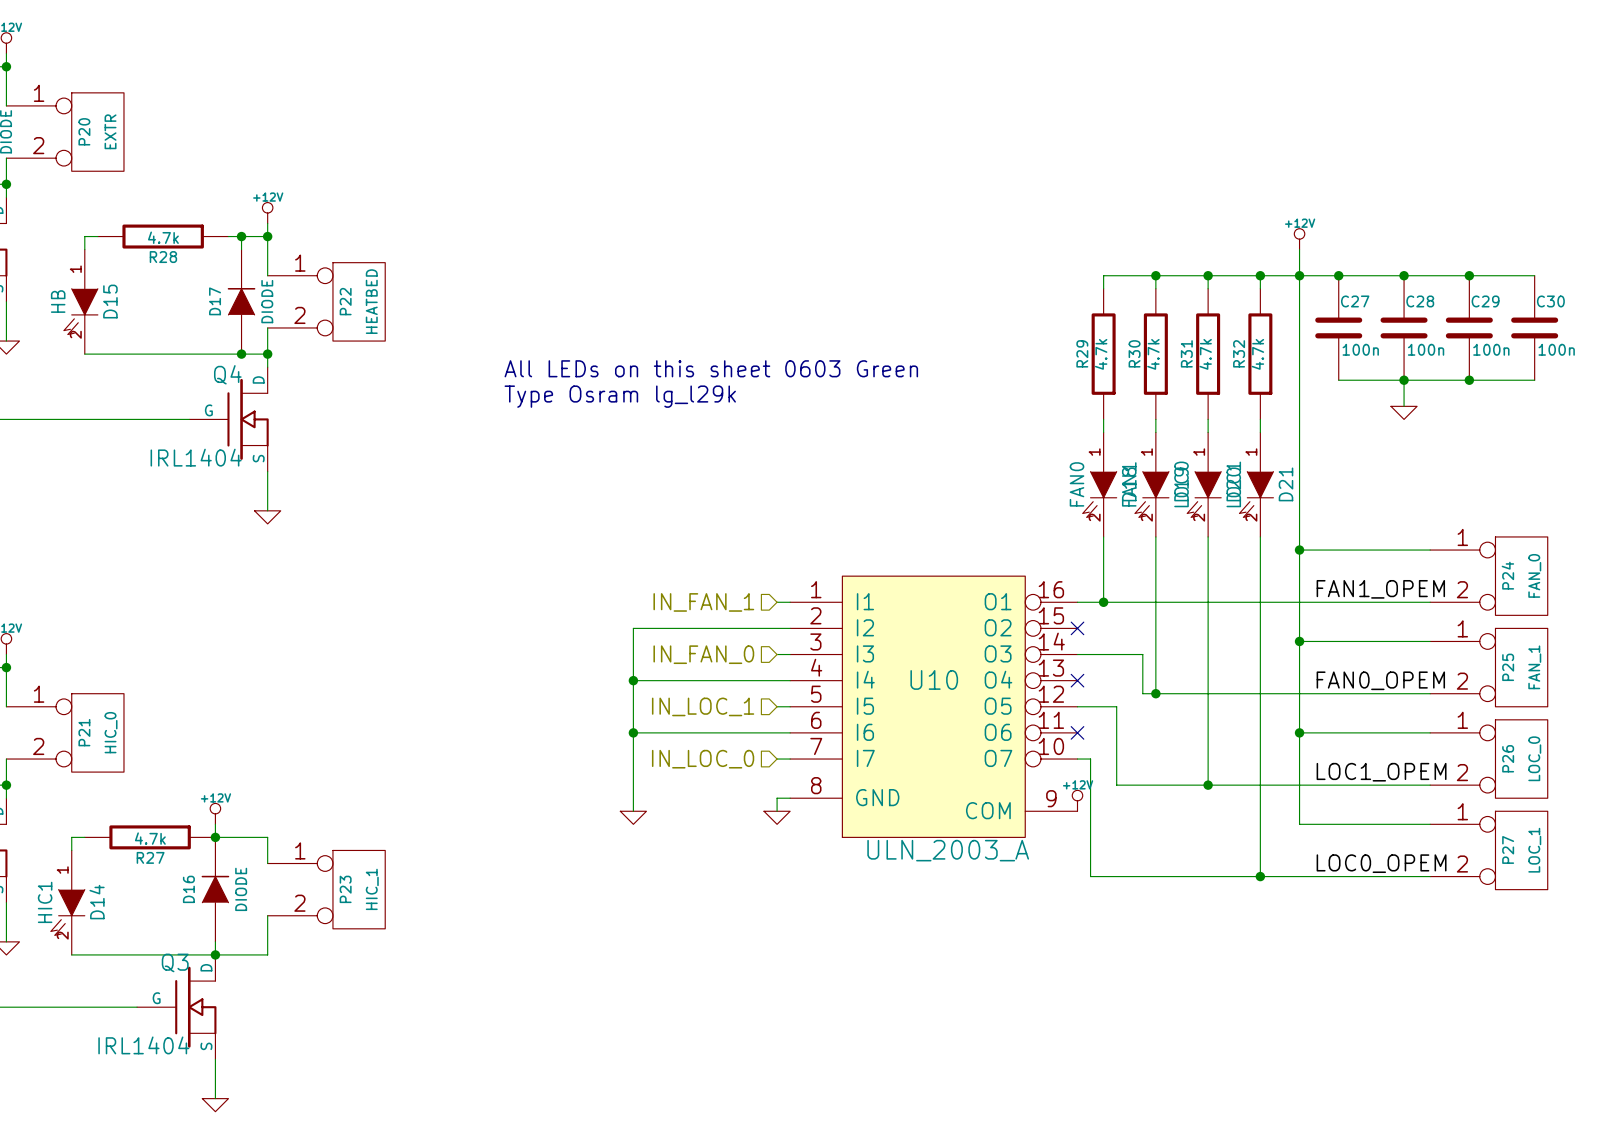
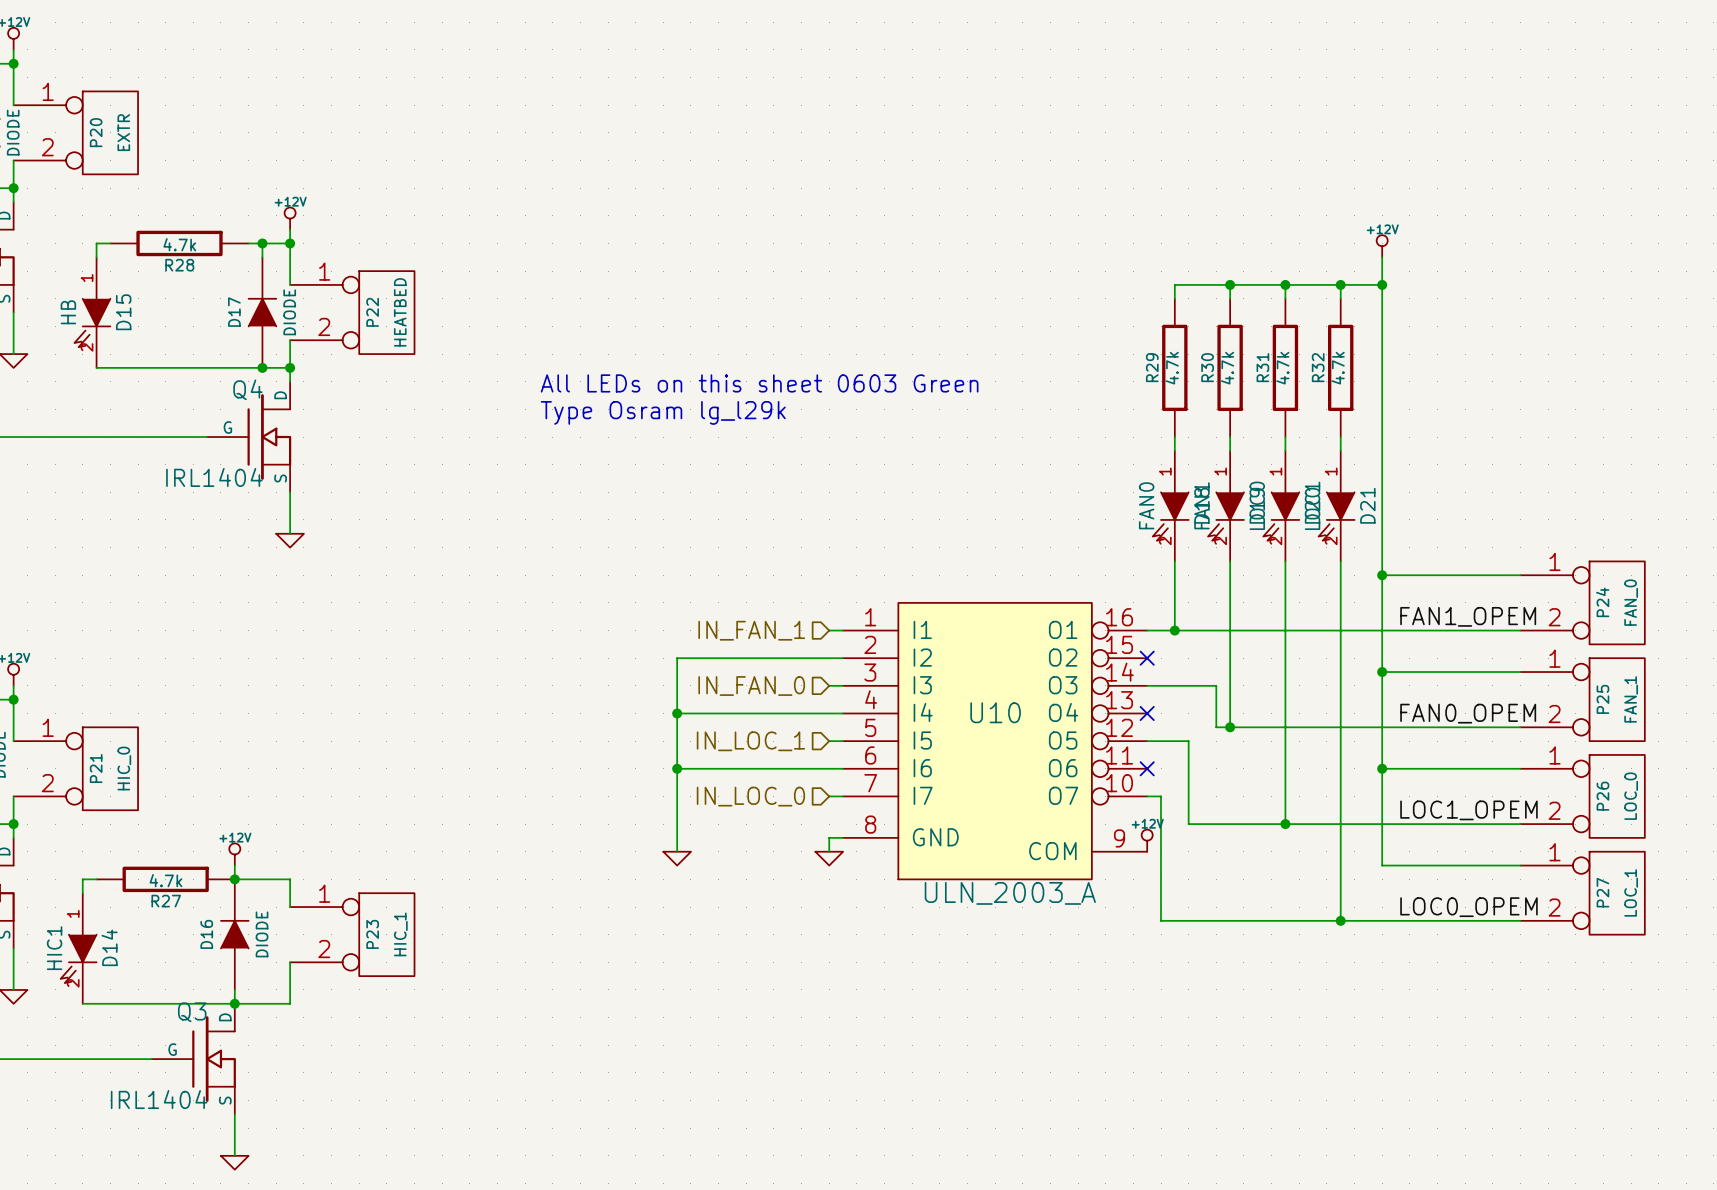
wire: (1299, 275) (1534, 275) -> none
junction: (1338, 275) -> none
junction: (1404, 275) -> none
junction: (1469, 275) -> none
C27: 100n (1338, 327) -> none
C28: 100n (1404, 327) -> none
C29: 100n (1469, 327) -> none
C30: 100n (1534, 327) -> none
wire: (1338, 380) (1534, 380) -> none
wire: (1404, 380) (1404, 406) -> none
junction: (1404, 380) -> none
junction: (1469, 380) -> none
power symbol: (1404, 412) -> none

